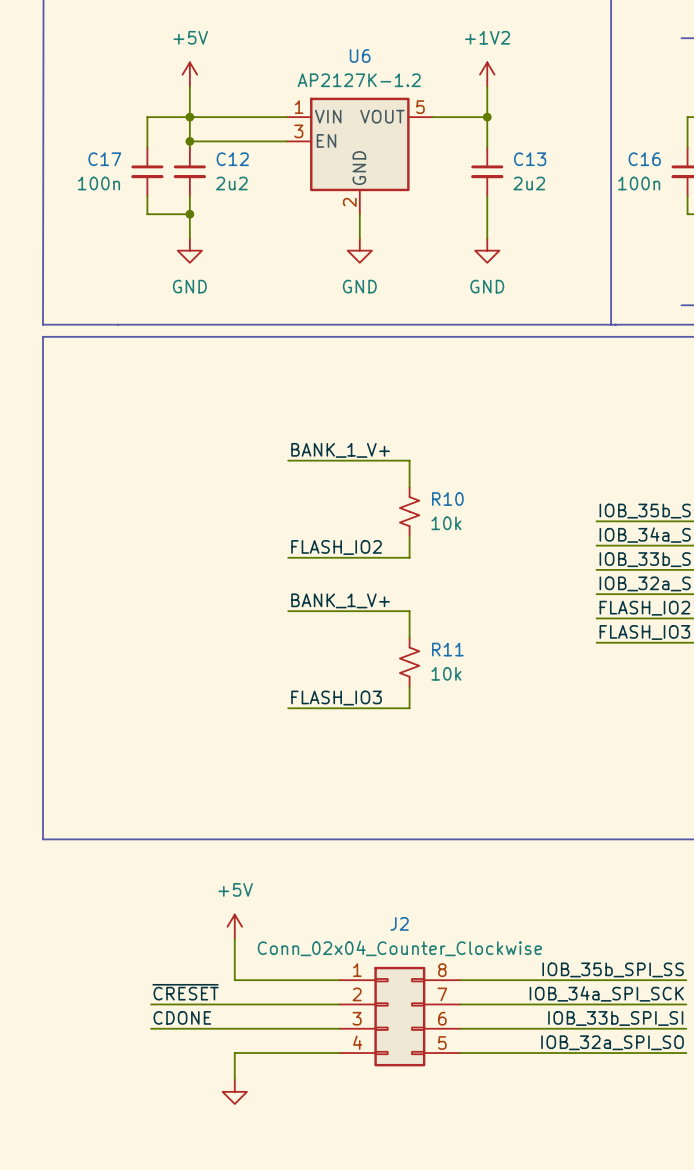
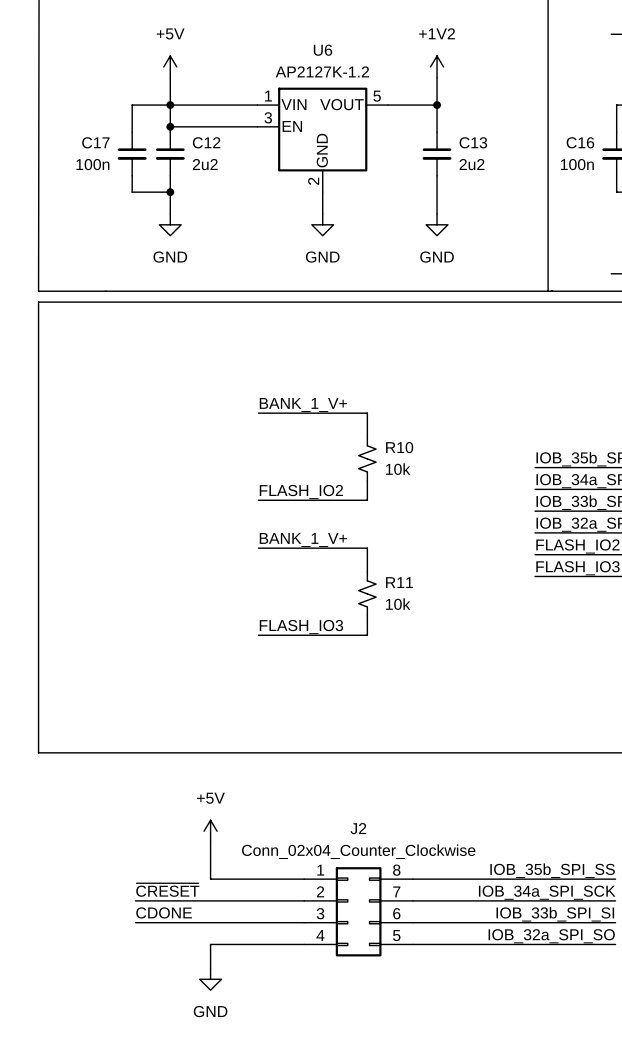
power symbol text: none -> GND (210, 1011)

